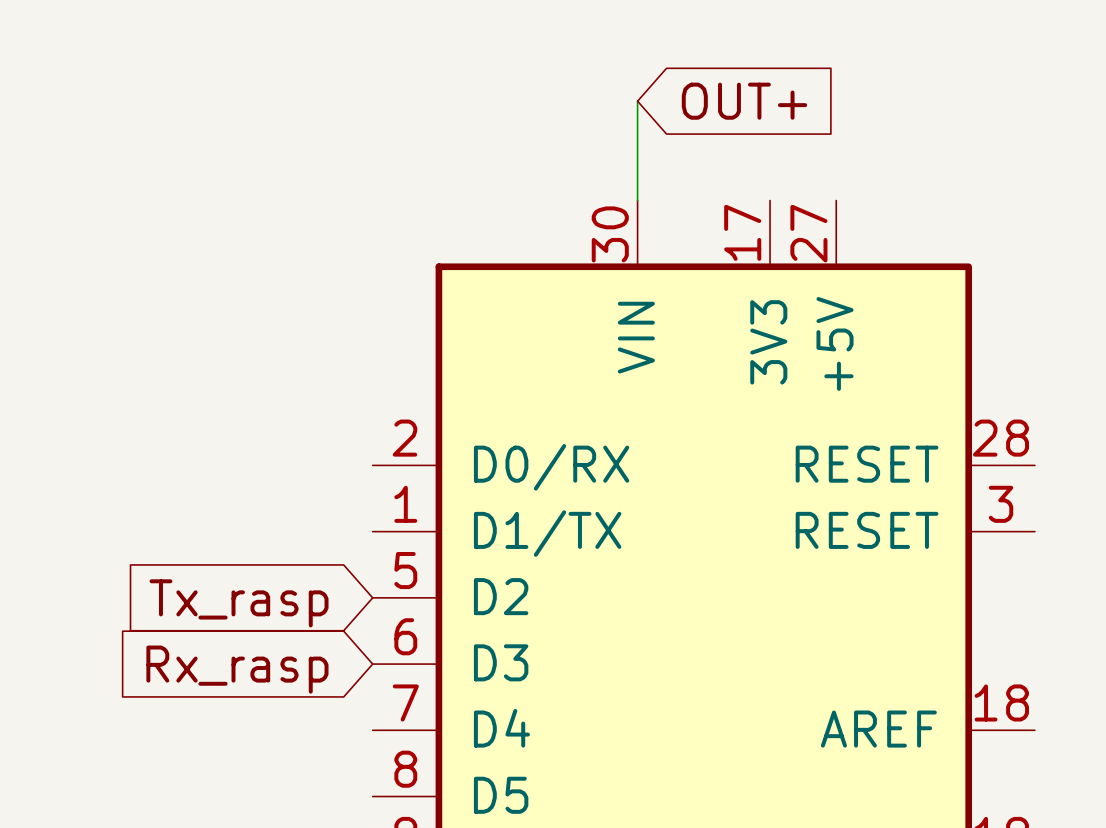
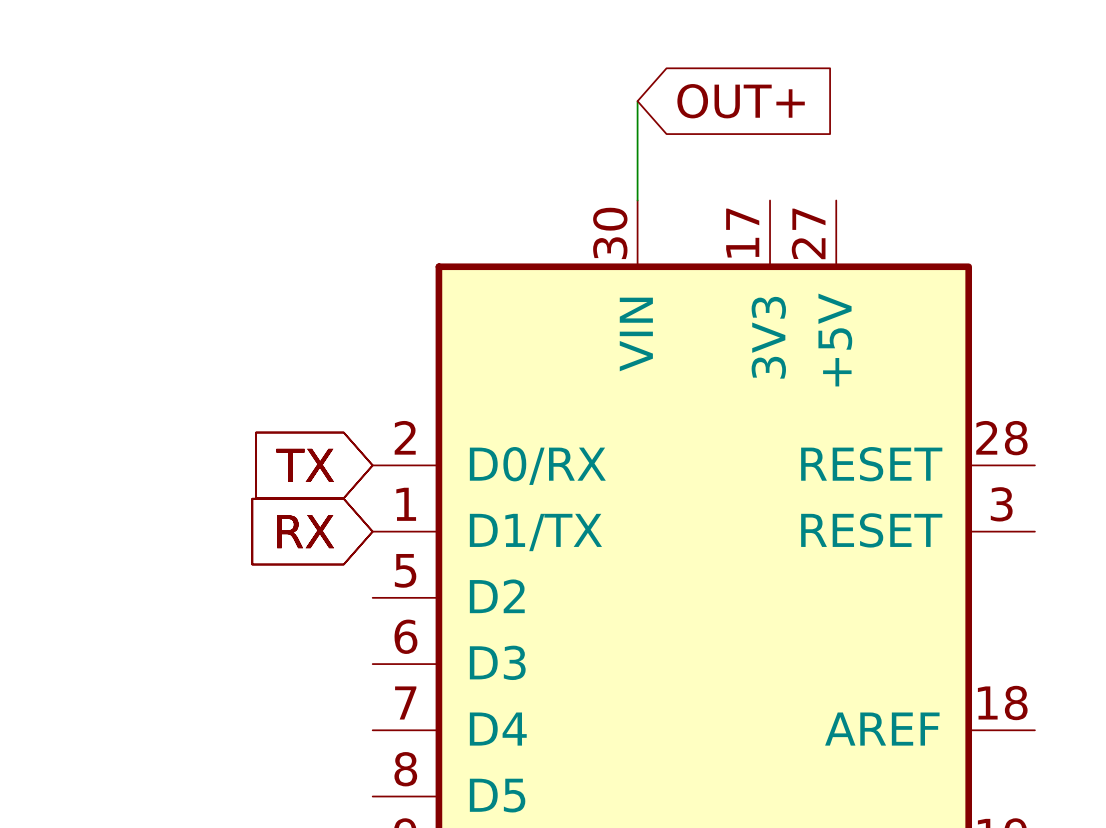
global label: none -> TX (305, 465)
global label: none -> RX (305, 531)
global label: Tx_rasp (239, 603) -> none
global label: Rx_rasp (237, 669) -> none

